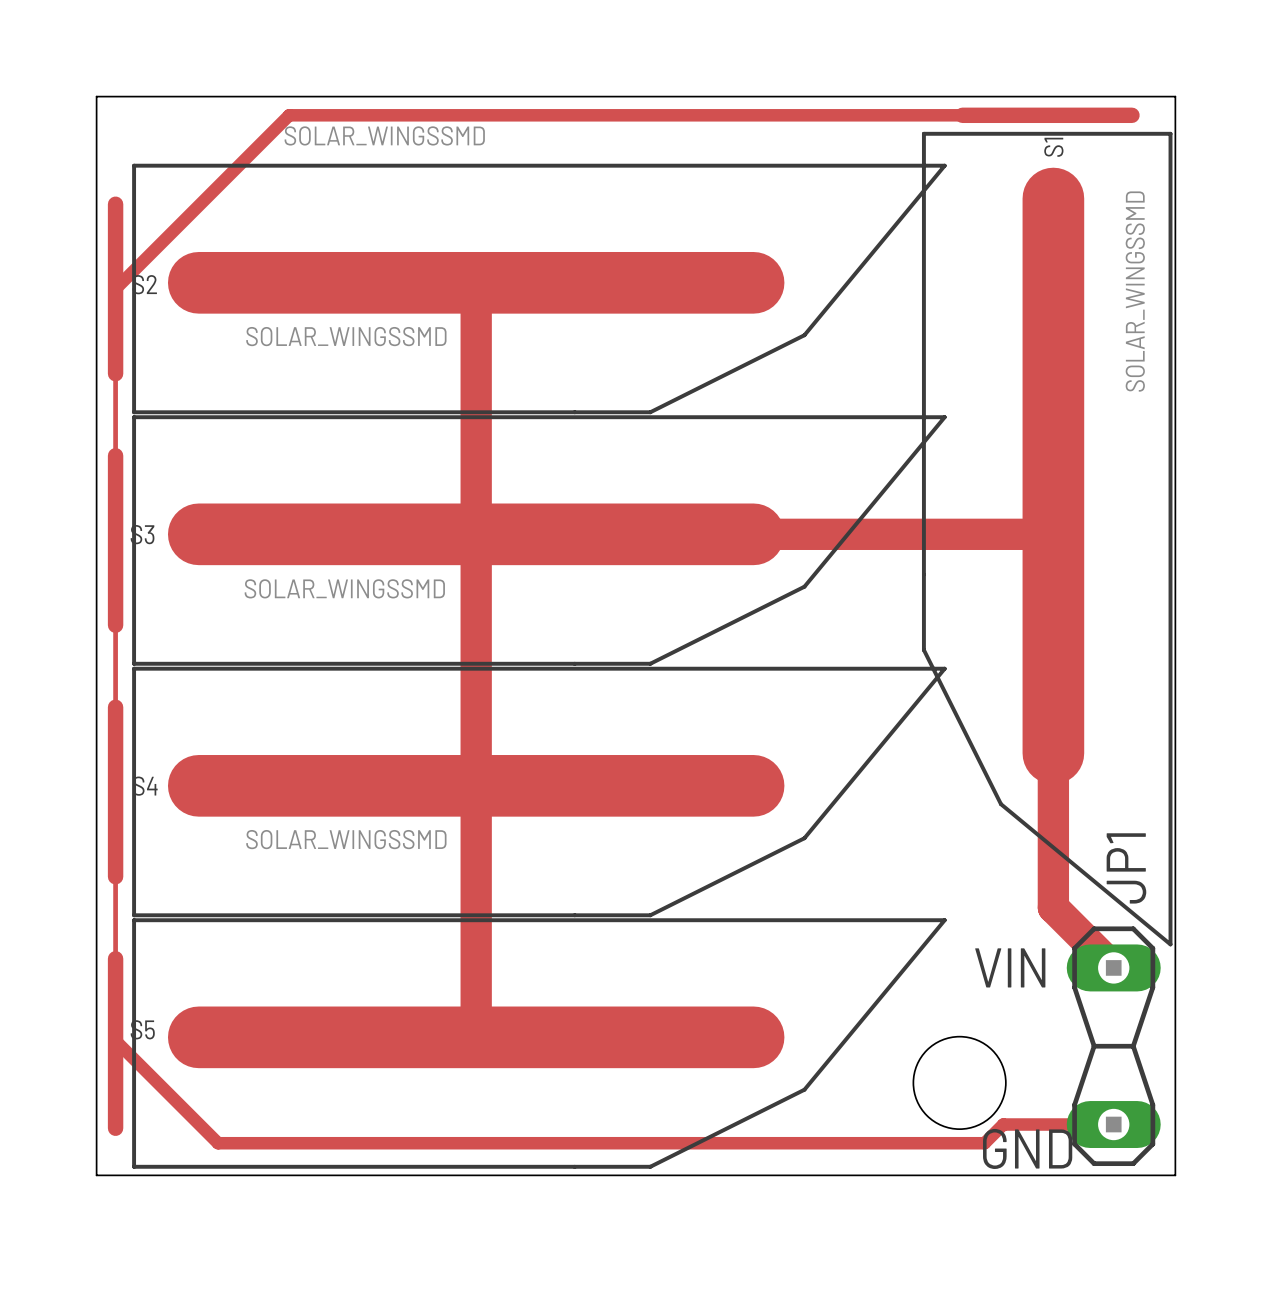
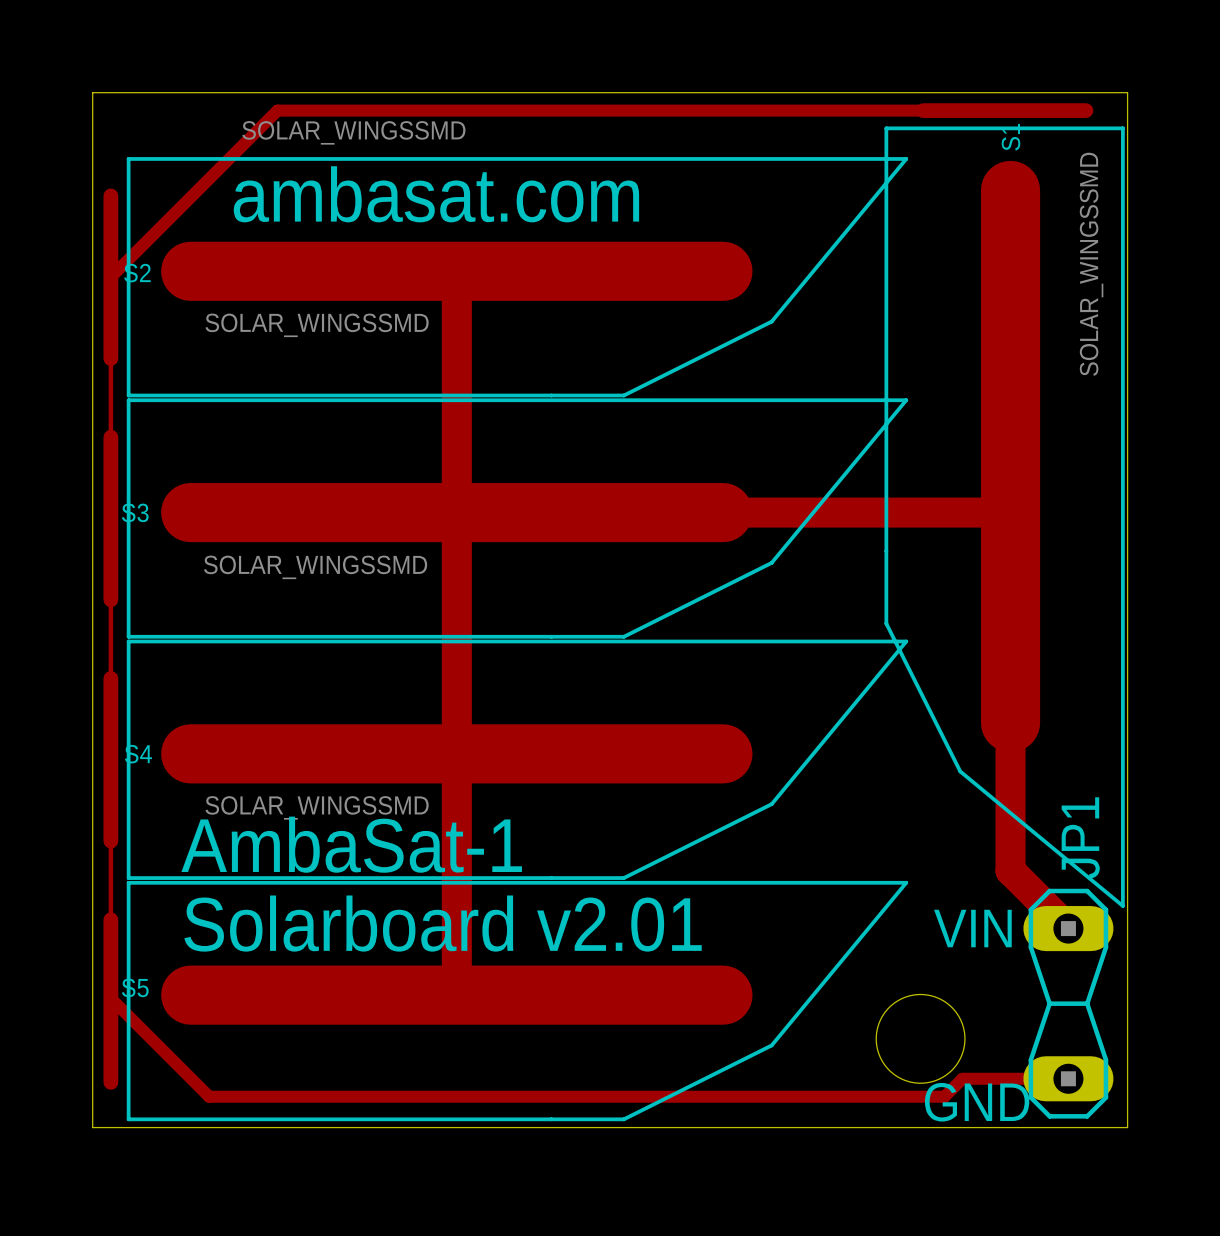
text: none -> ambasat.com (436, 194)
text: none -> AmbaSat-1 (351, 844)
text: none -> Solarboard v2.01 (443, 923)

